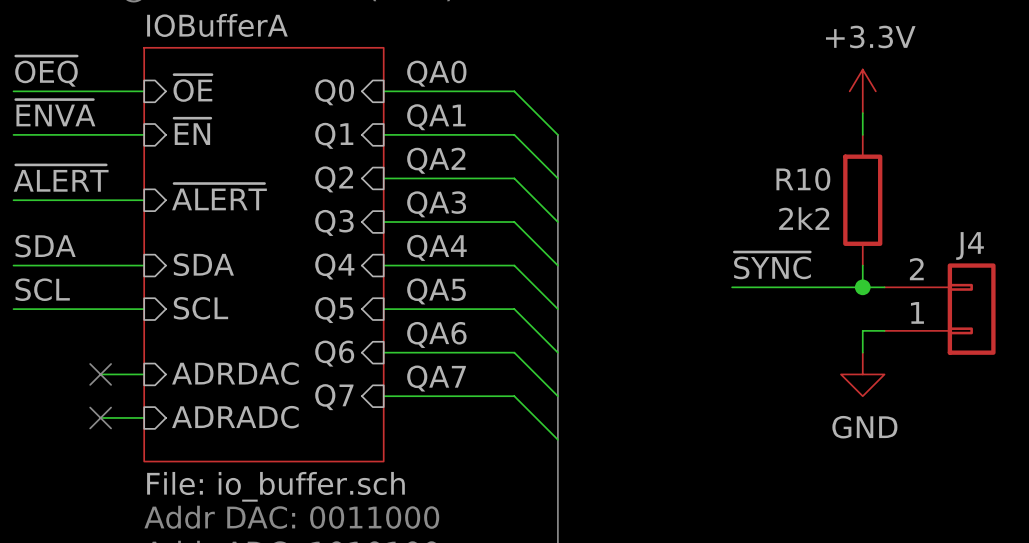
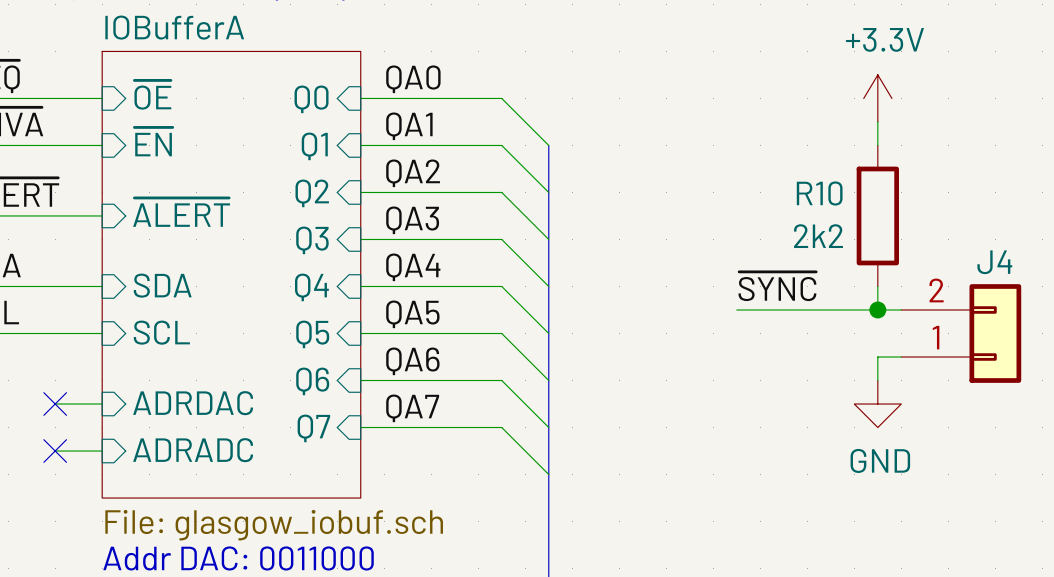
sheet IOBufferA value: File: io_buffer.sch (275, 486) -> File: glasgow_iobuf.sch (274, 525)

